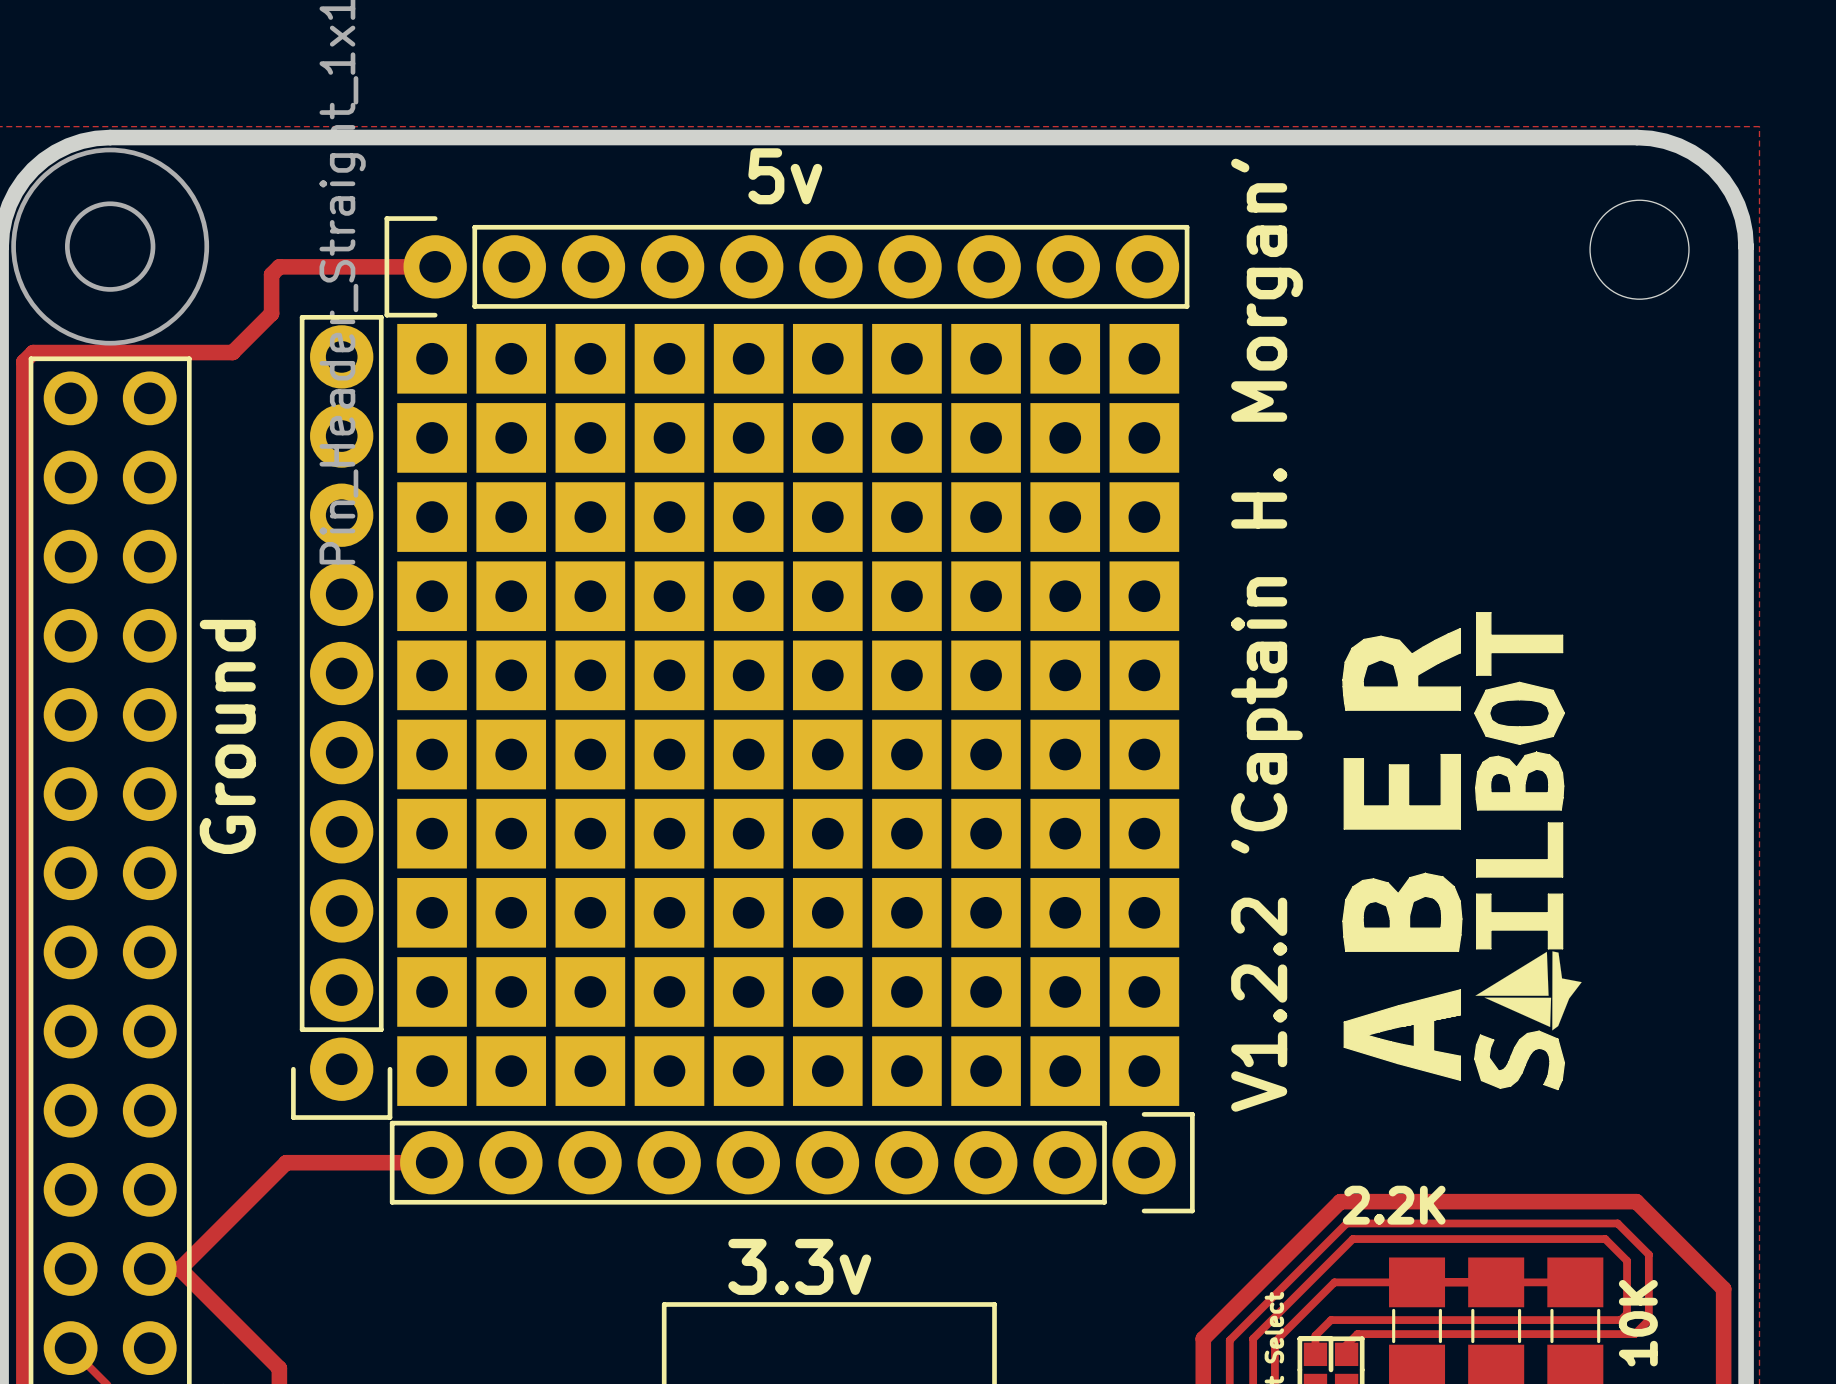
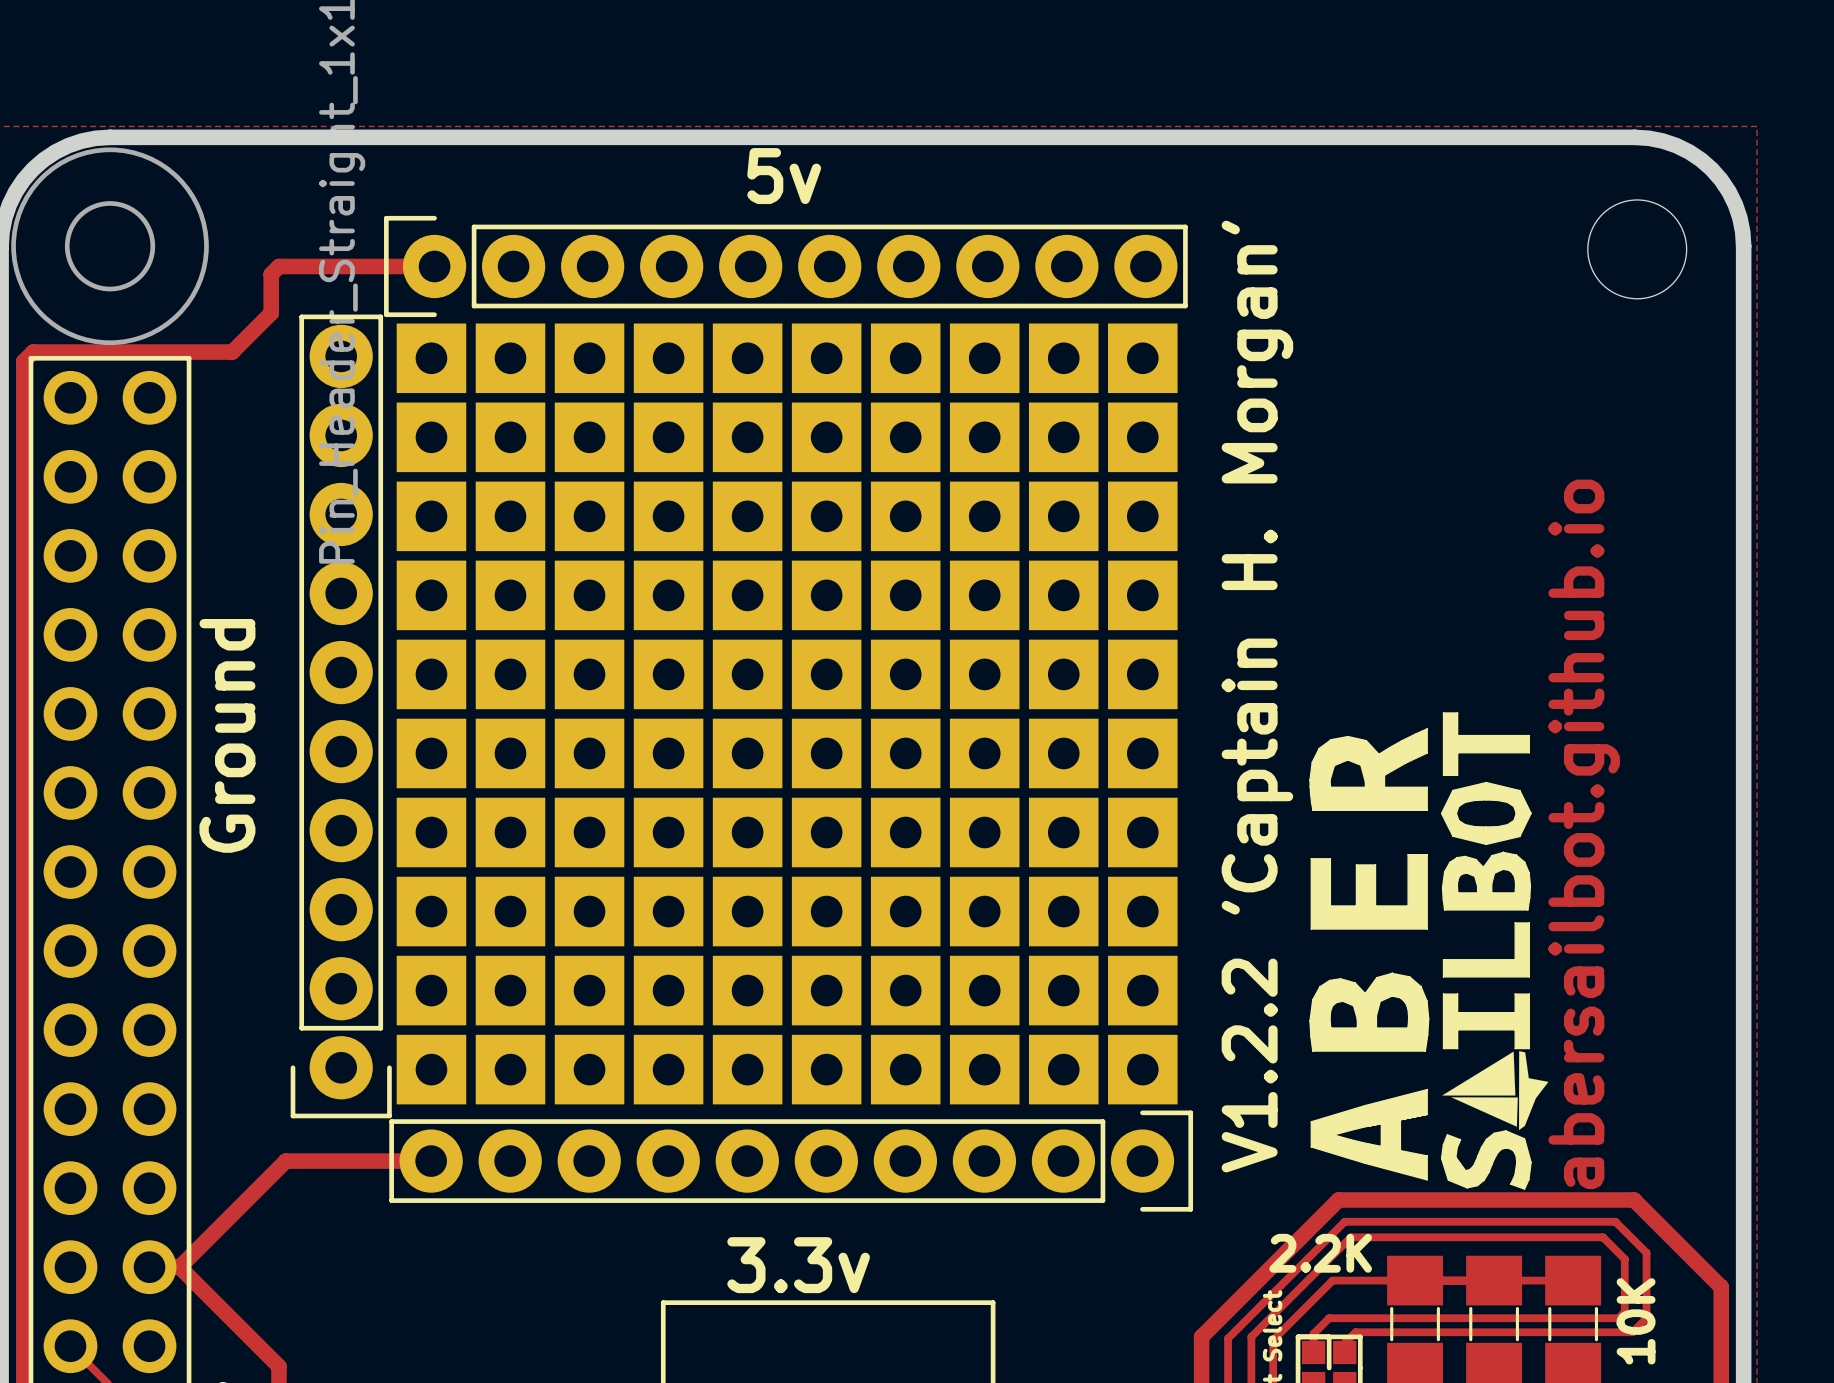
text position: V1.2.2 'Captain H. Morgan' (1266, 635) -> V1.2.2 'Captain H. Morgan' (1257, 696)
text: none -> abersailbot.github.io (1584, 834)
drawing position: (1462, 851) -> (1429, 951)
text position: 2.2K (1394, 1205) -> 2.2K (1320, 1253)

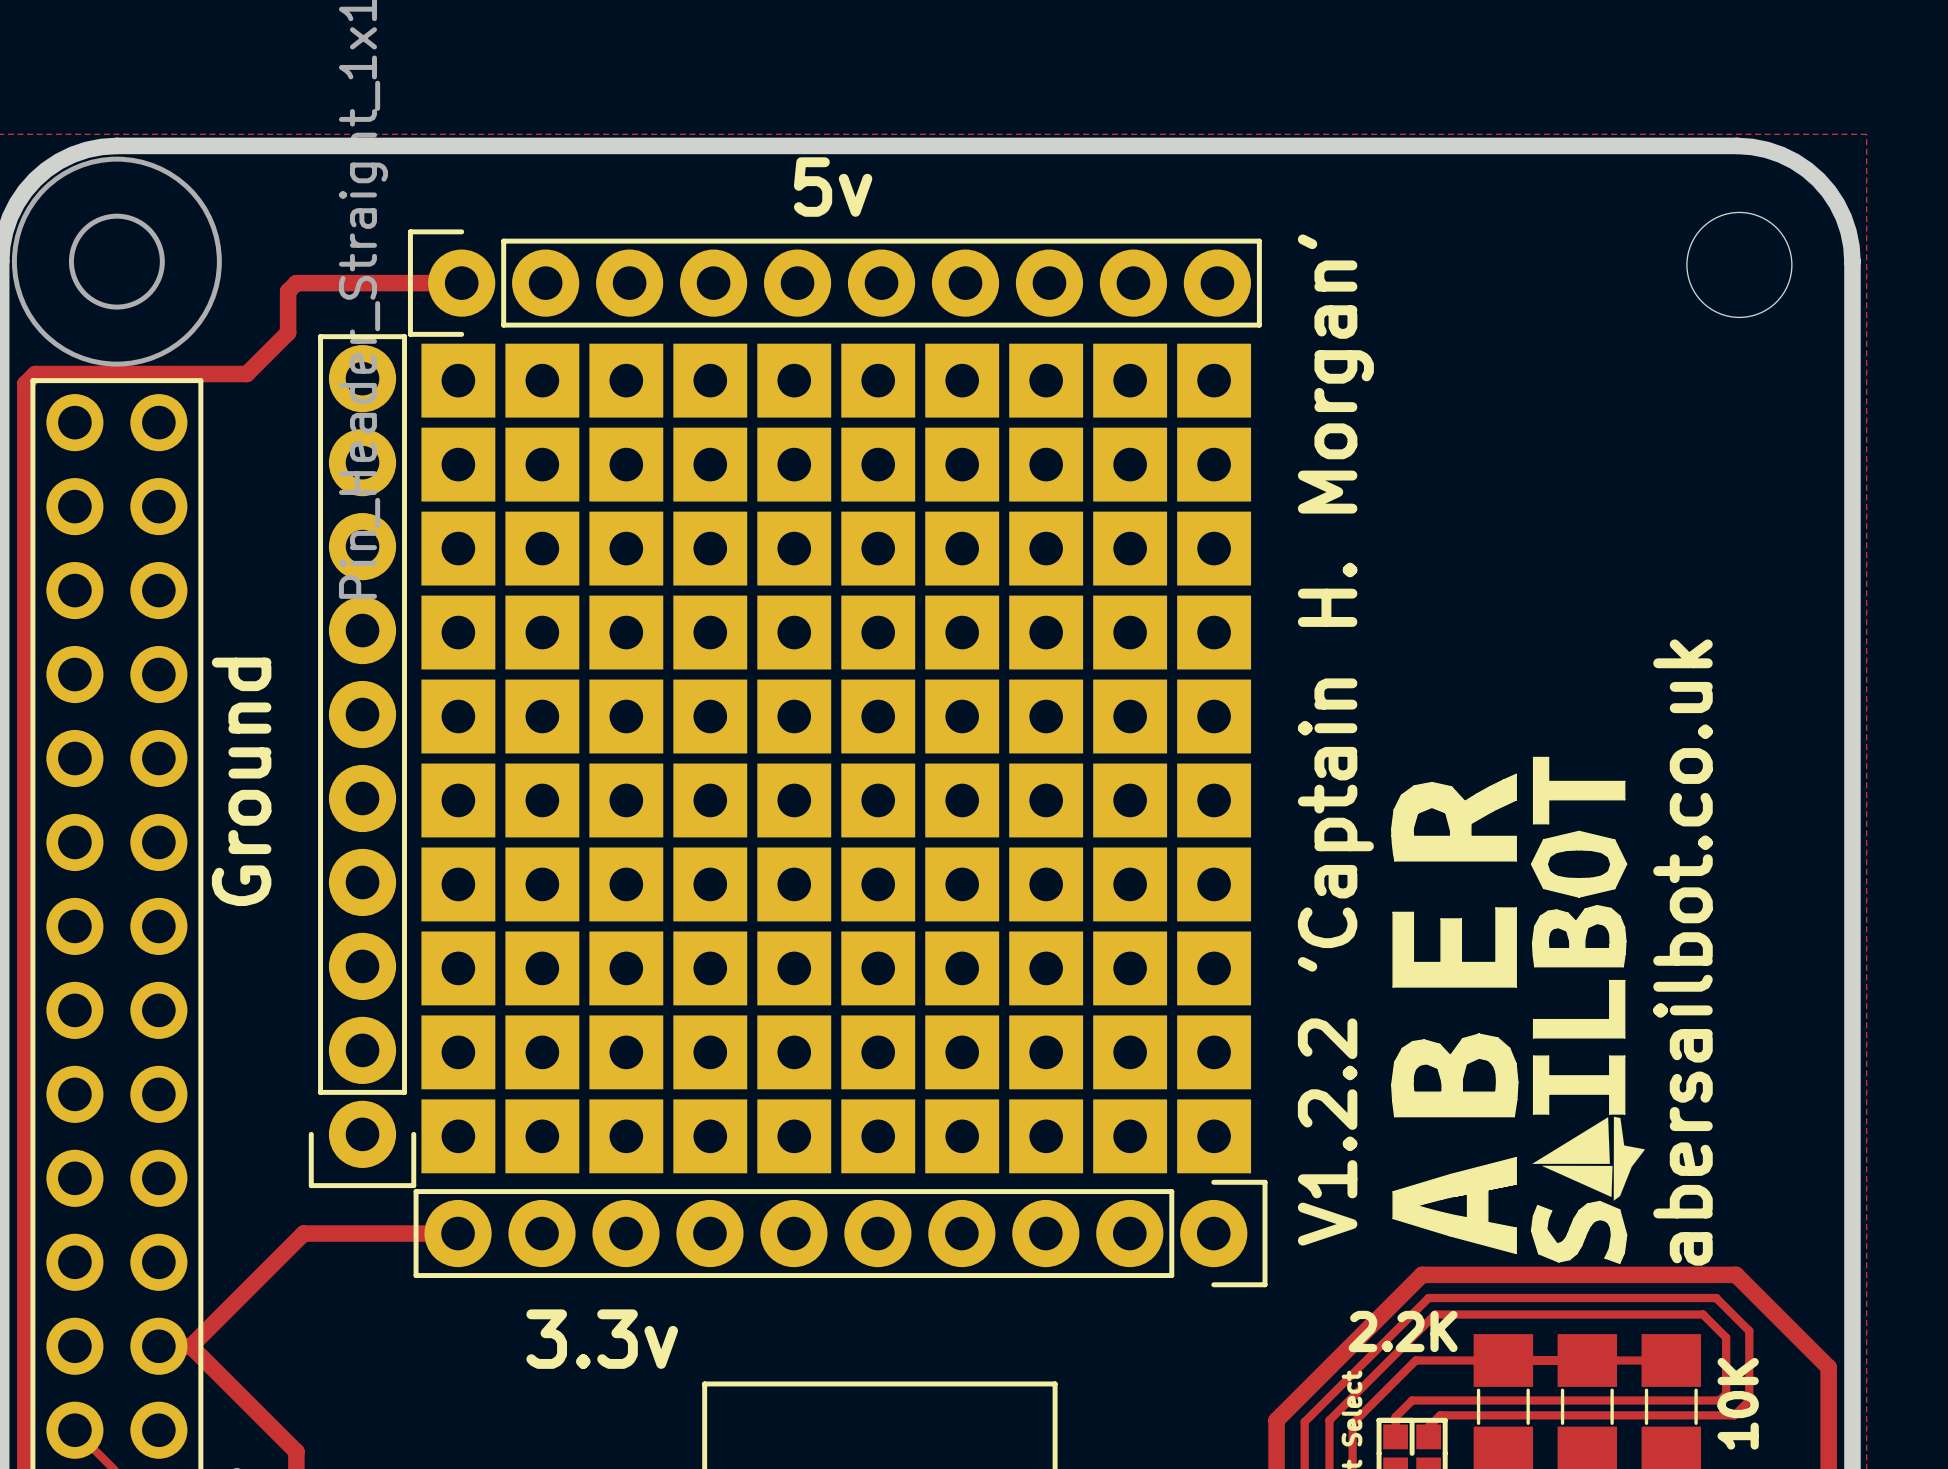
text: abersailbot.github.io (1584, 834) -> abersailbot.co.uk (1683, 952)
text position: 3.3v (798, 1265) -> 3.3v (602, 1339)

